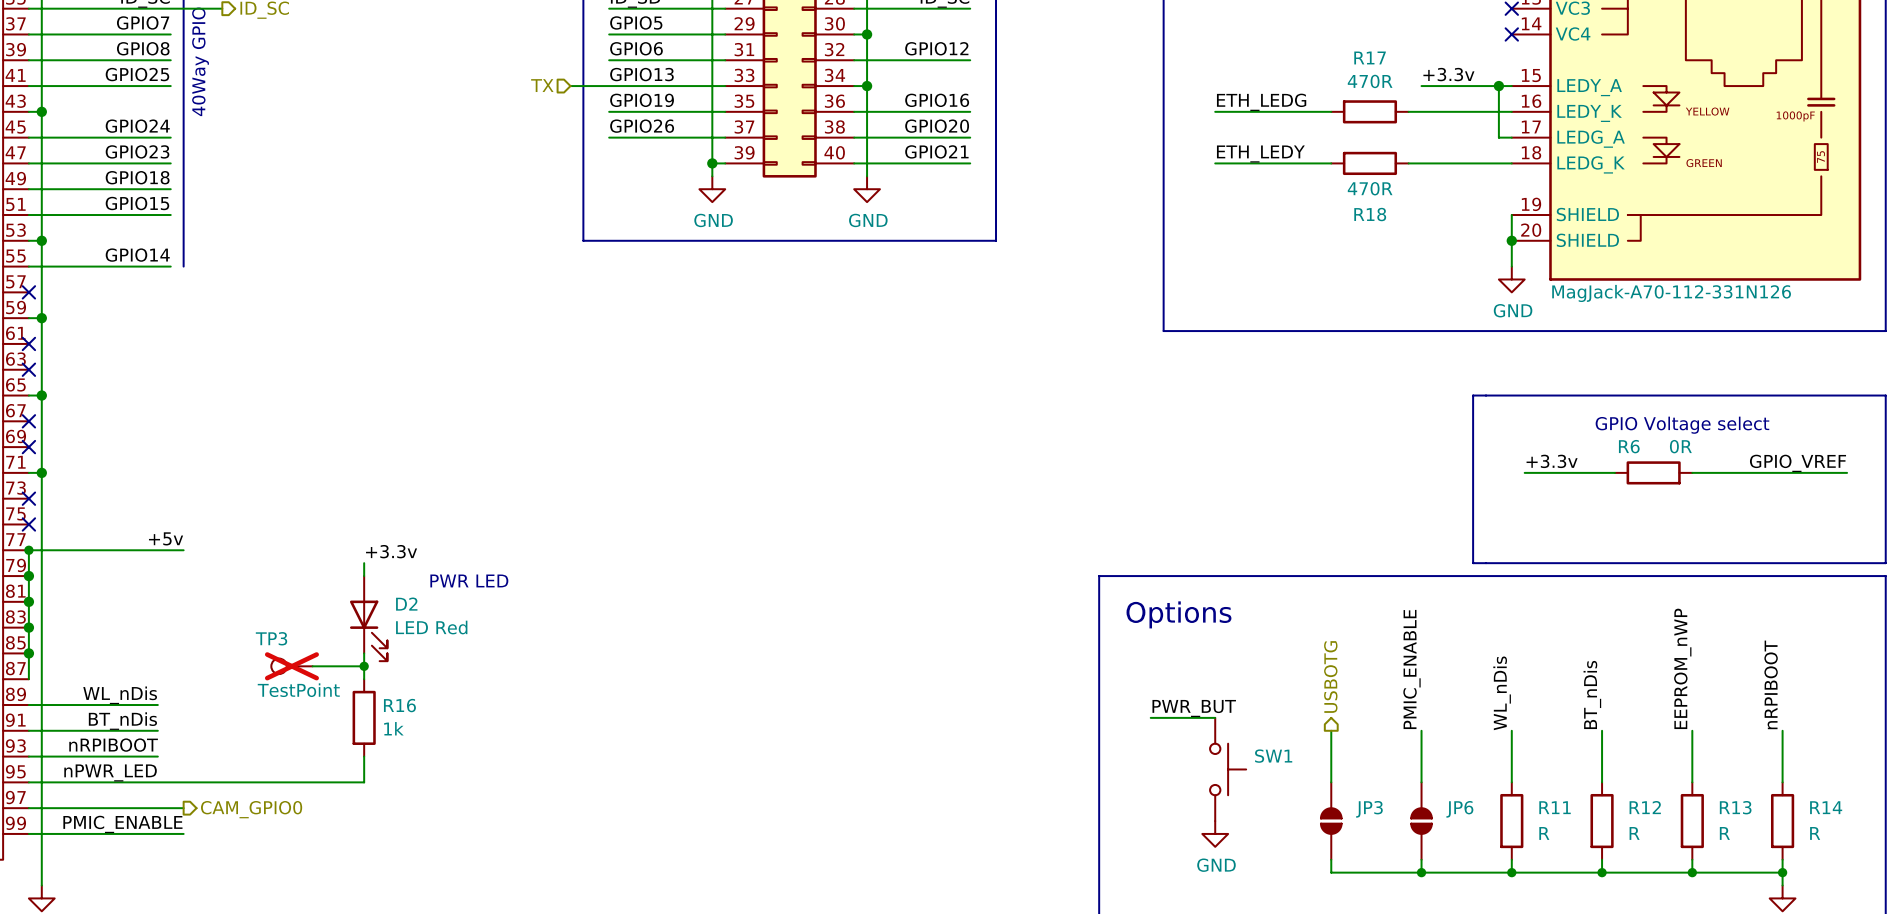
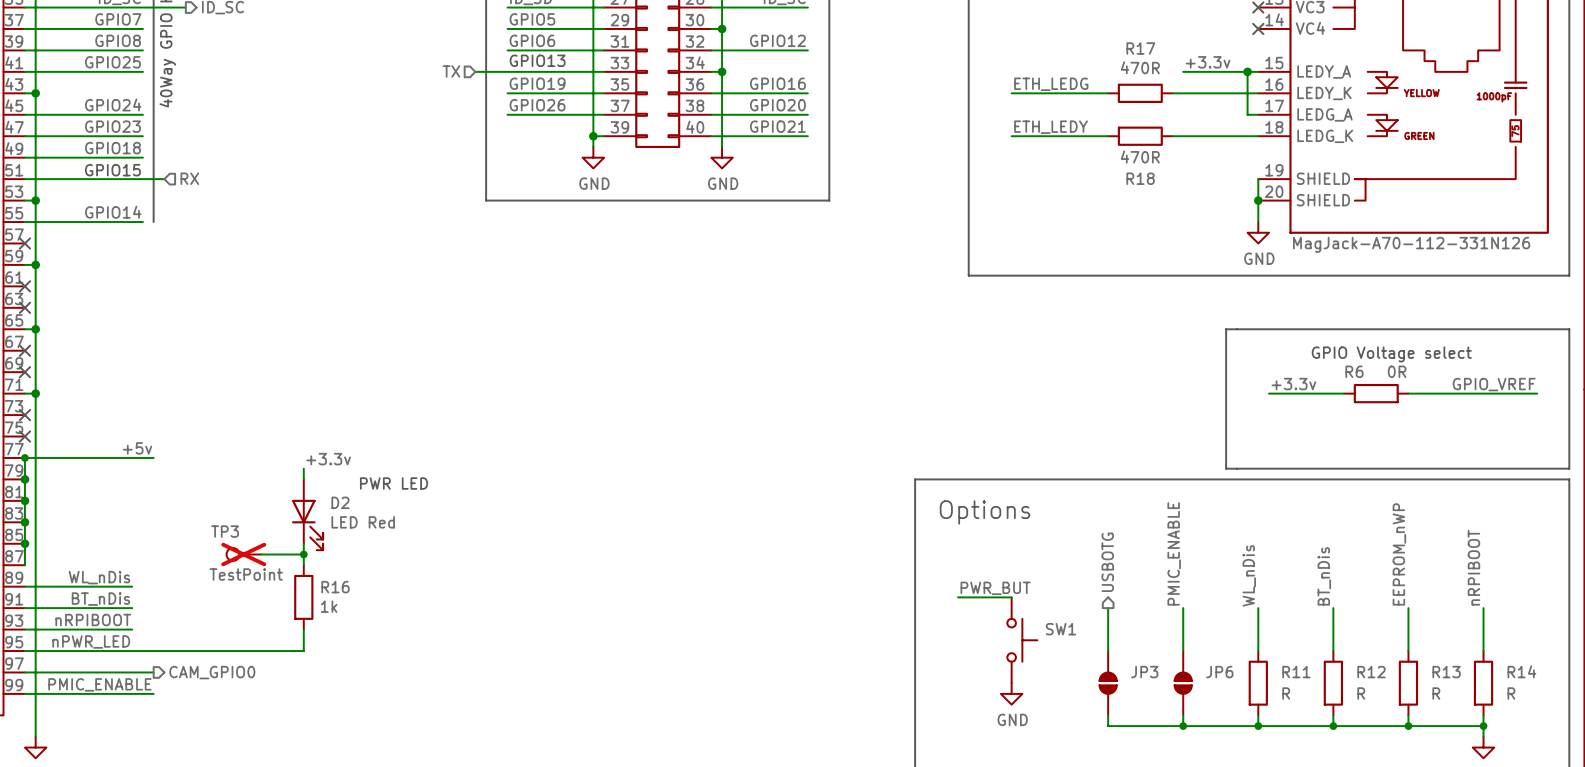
text: none -> GPIO13 (537, 60)
label: GPIO13 (641, 74) -> none
label: GPIO15 (137, 203) -> none
text: none -> GPIO15 (112, 170)
hierarchical label: none -> RX (189, 178)
wire: none -> (142, 179) (164, 179)

